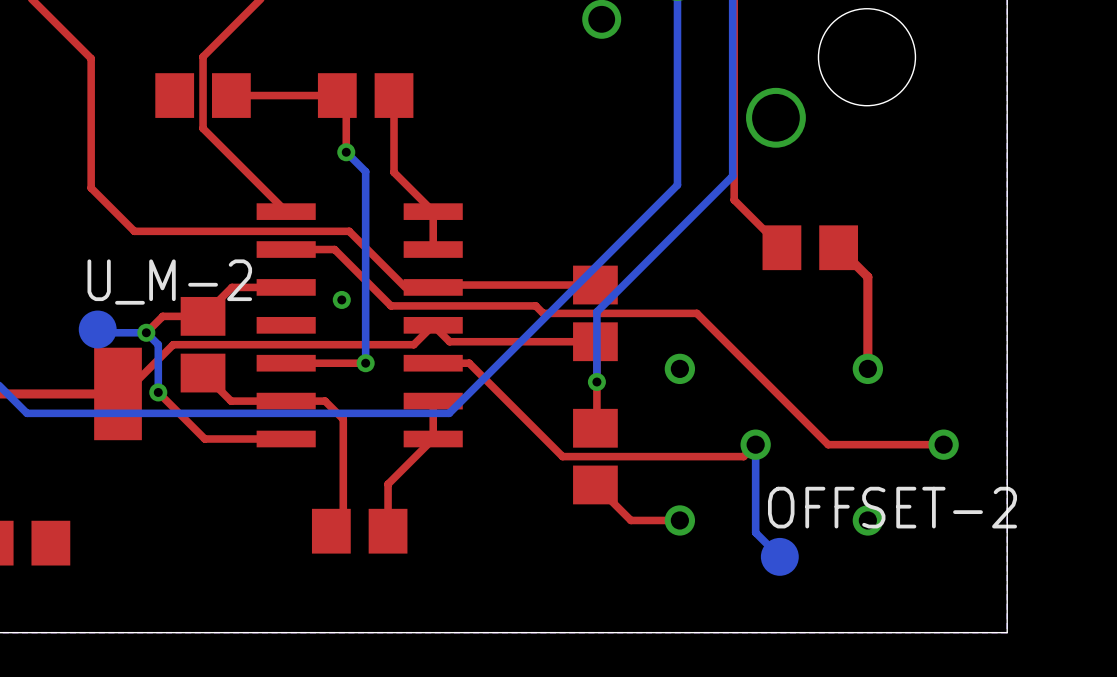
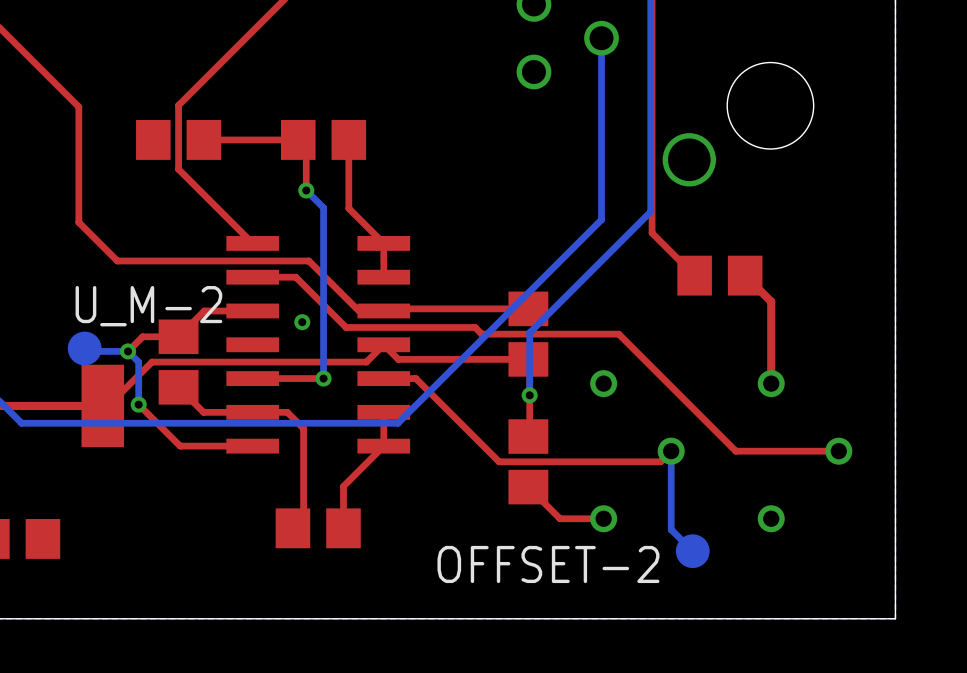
OFFSET-2 name position: OFFSET-2 (892, 507) -> OFFSET-2 (548, 564)

